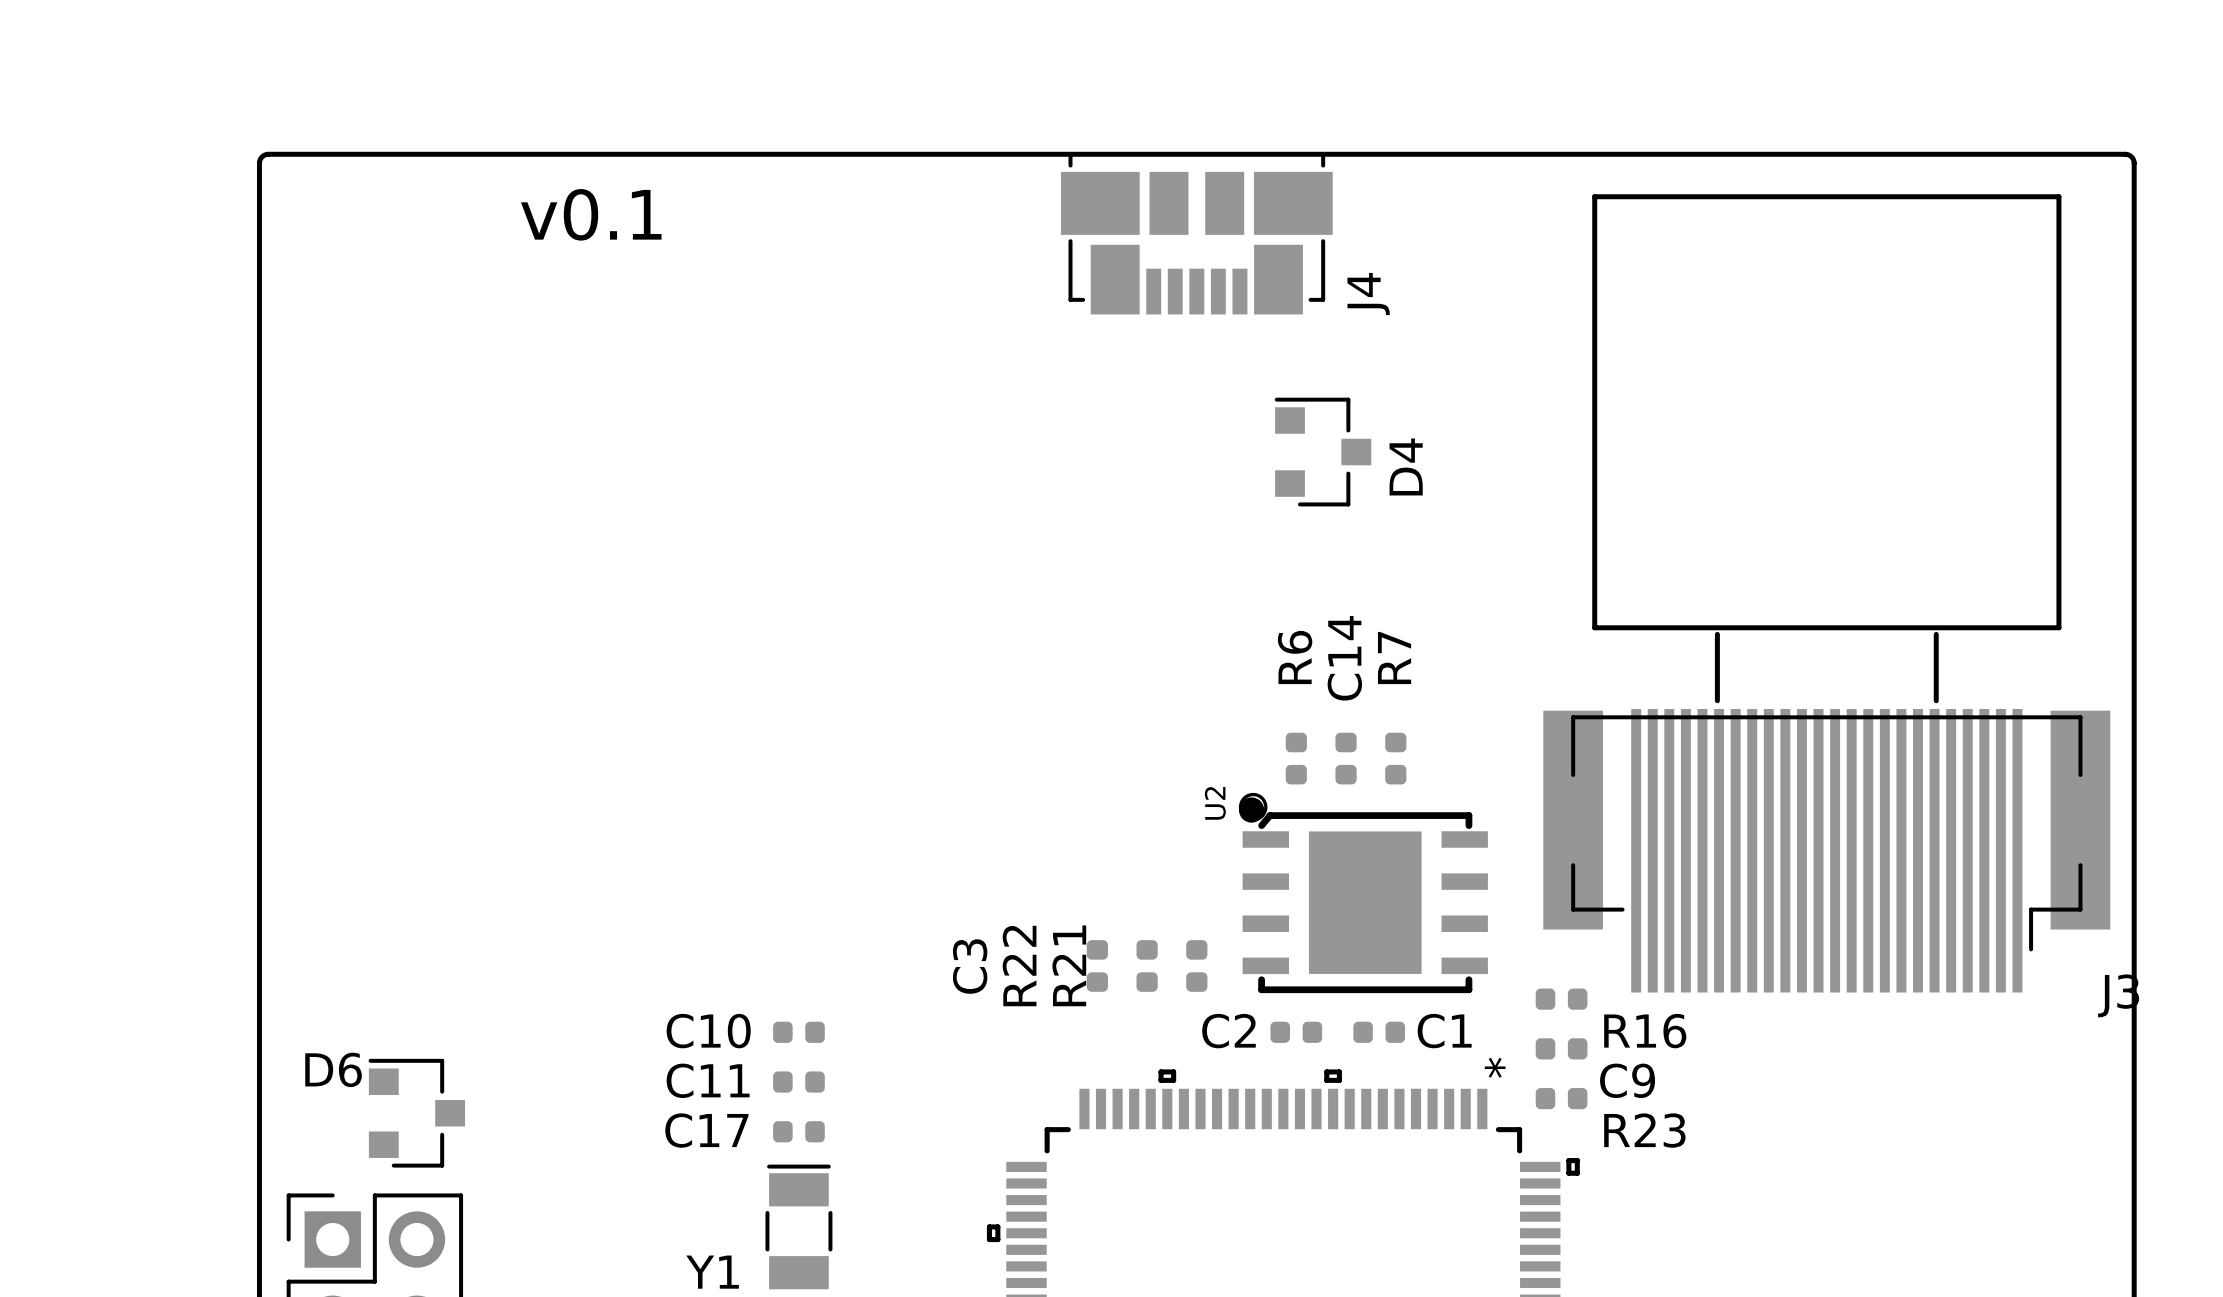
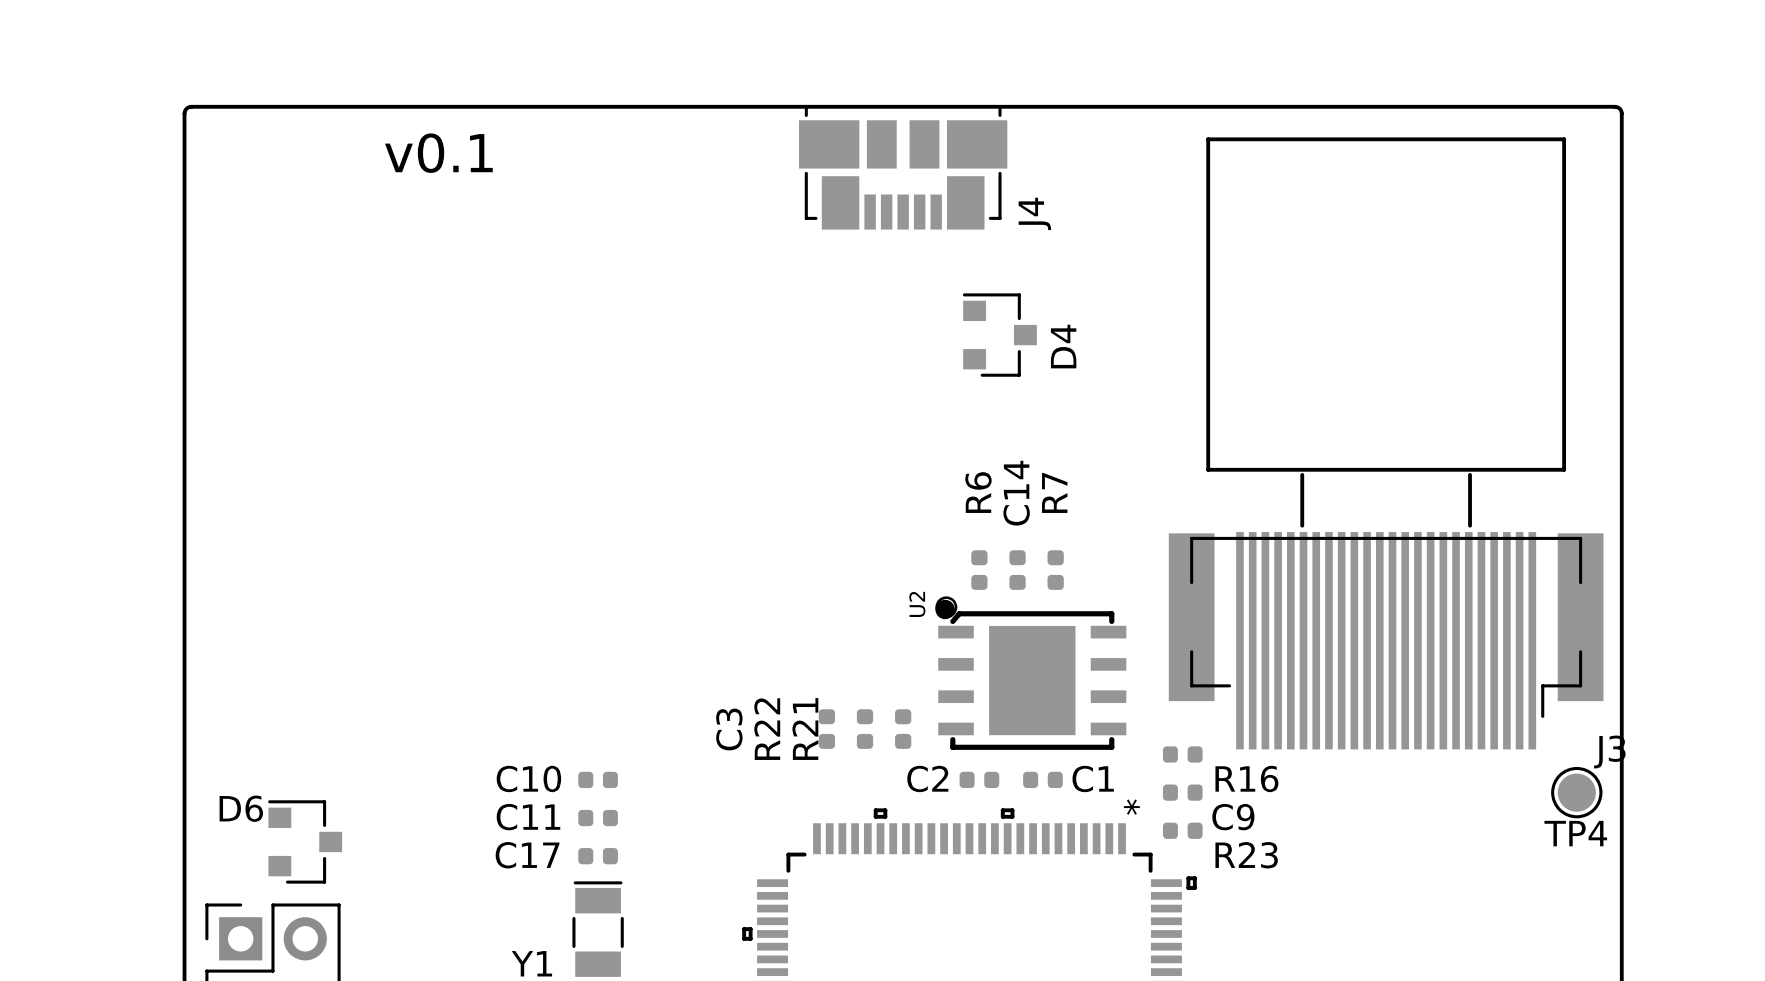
TP4: none -> (1576, 792)

